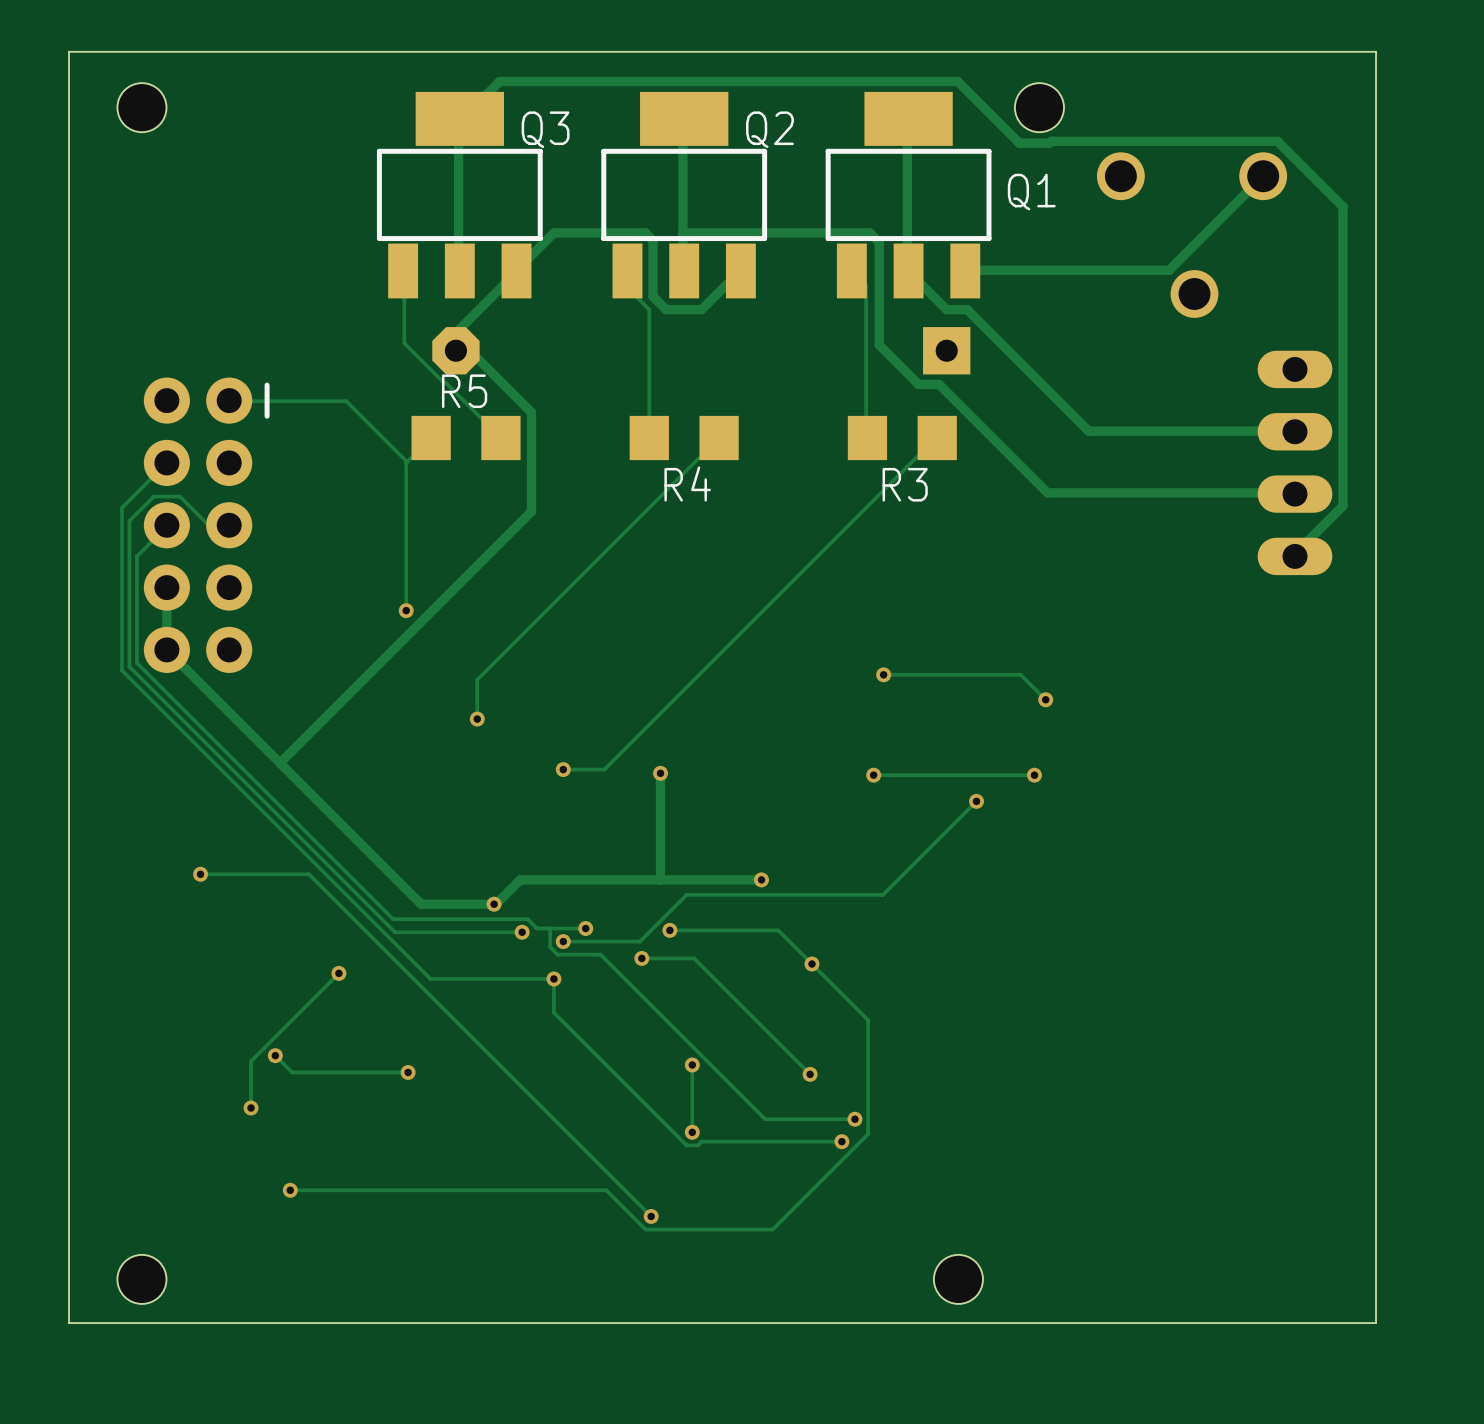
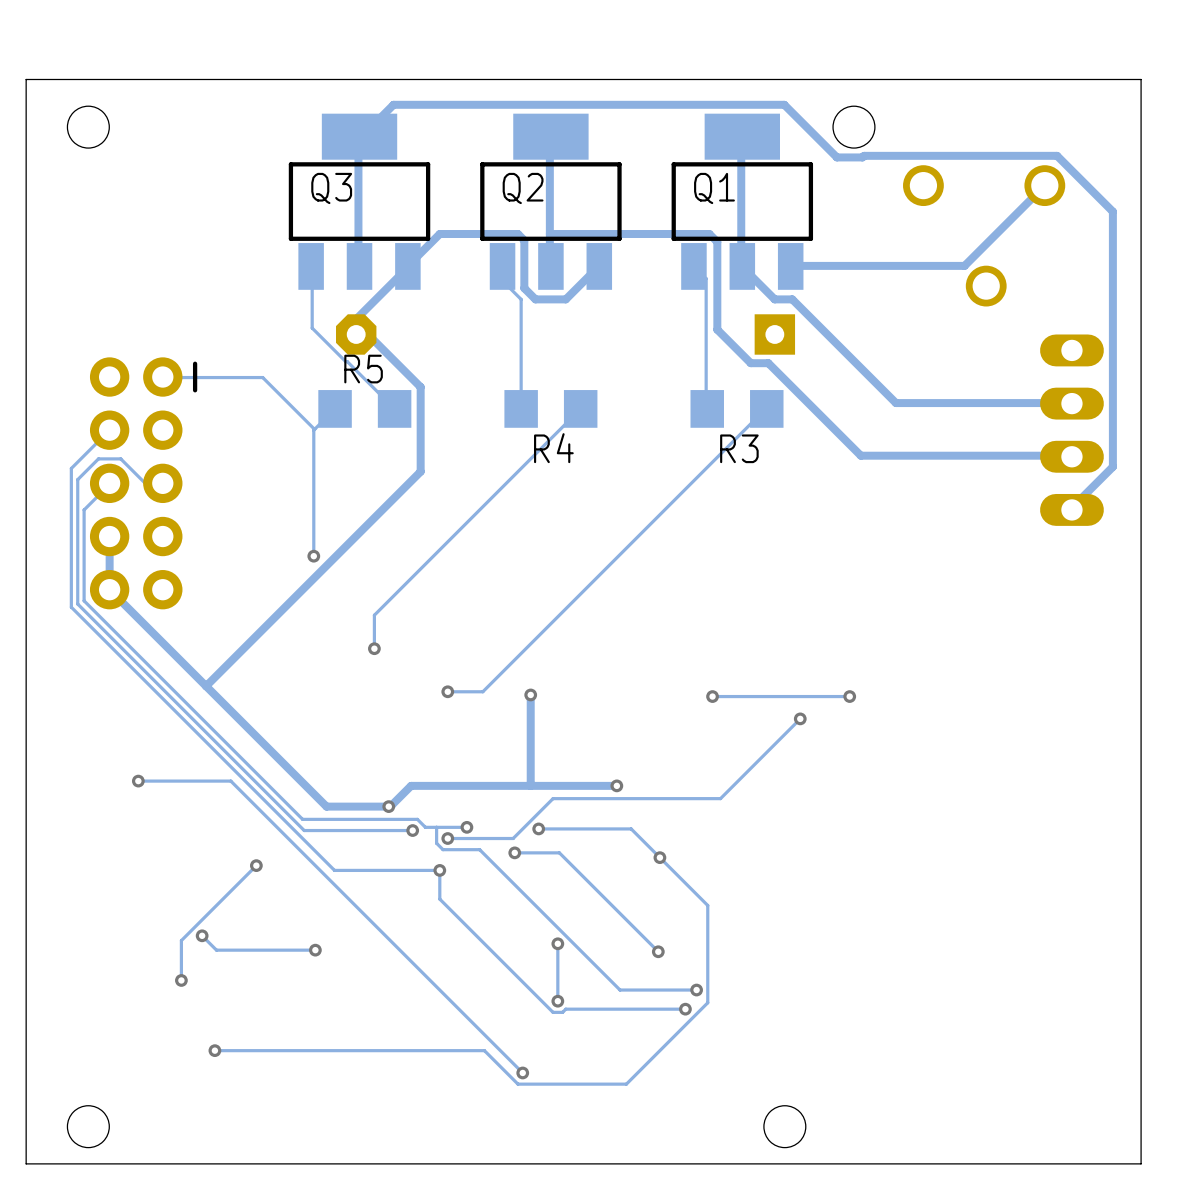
Q3 name position: Q3 (545, 129) -> Q3 (331, 188)
Q2 name position: Q2 (769, 129) -> Q2 (523, 188)
Q1 name position: Q1 (1031, 192) -> Q1 (714, 188)
track: (883, 674) (1020, 674) (1045, 699) -> none
via: (883, 674) -> none
via: (1045, 699) -> none

